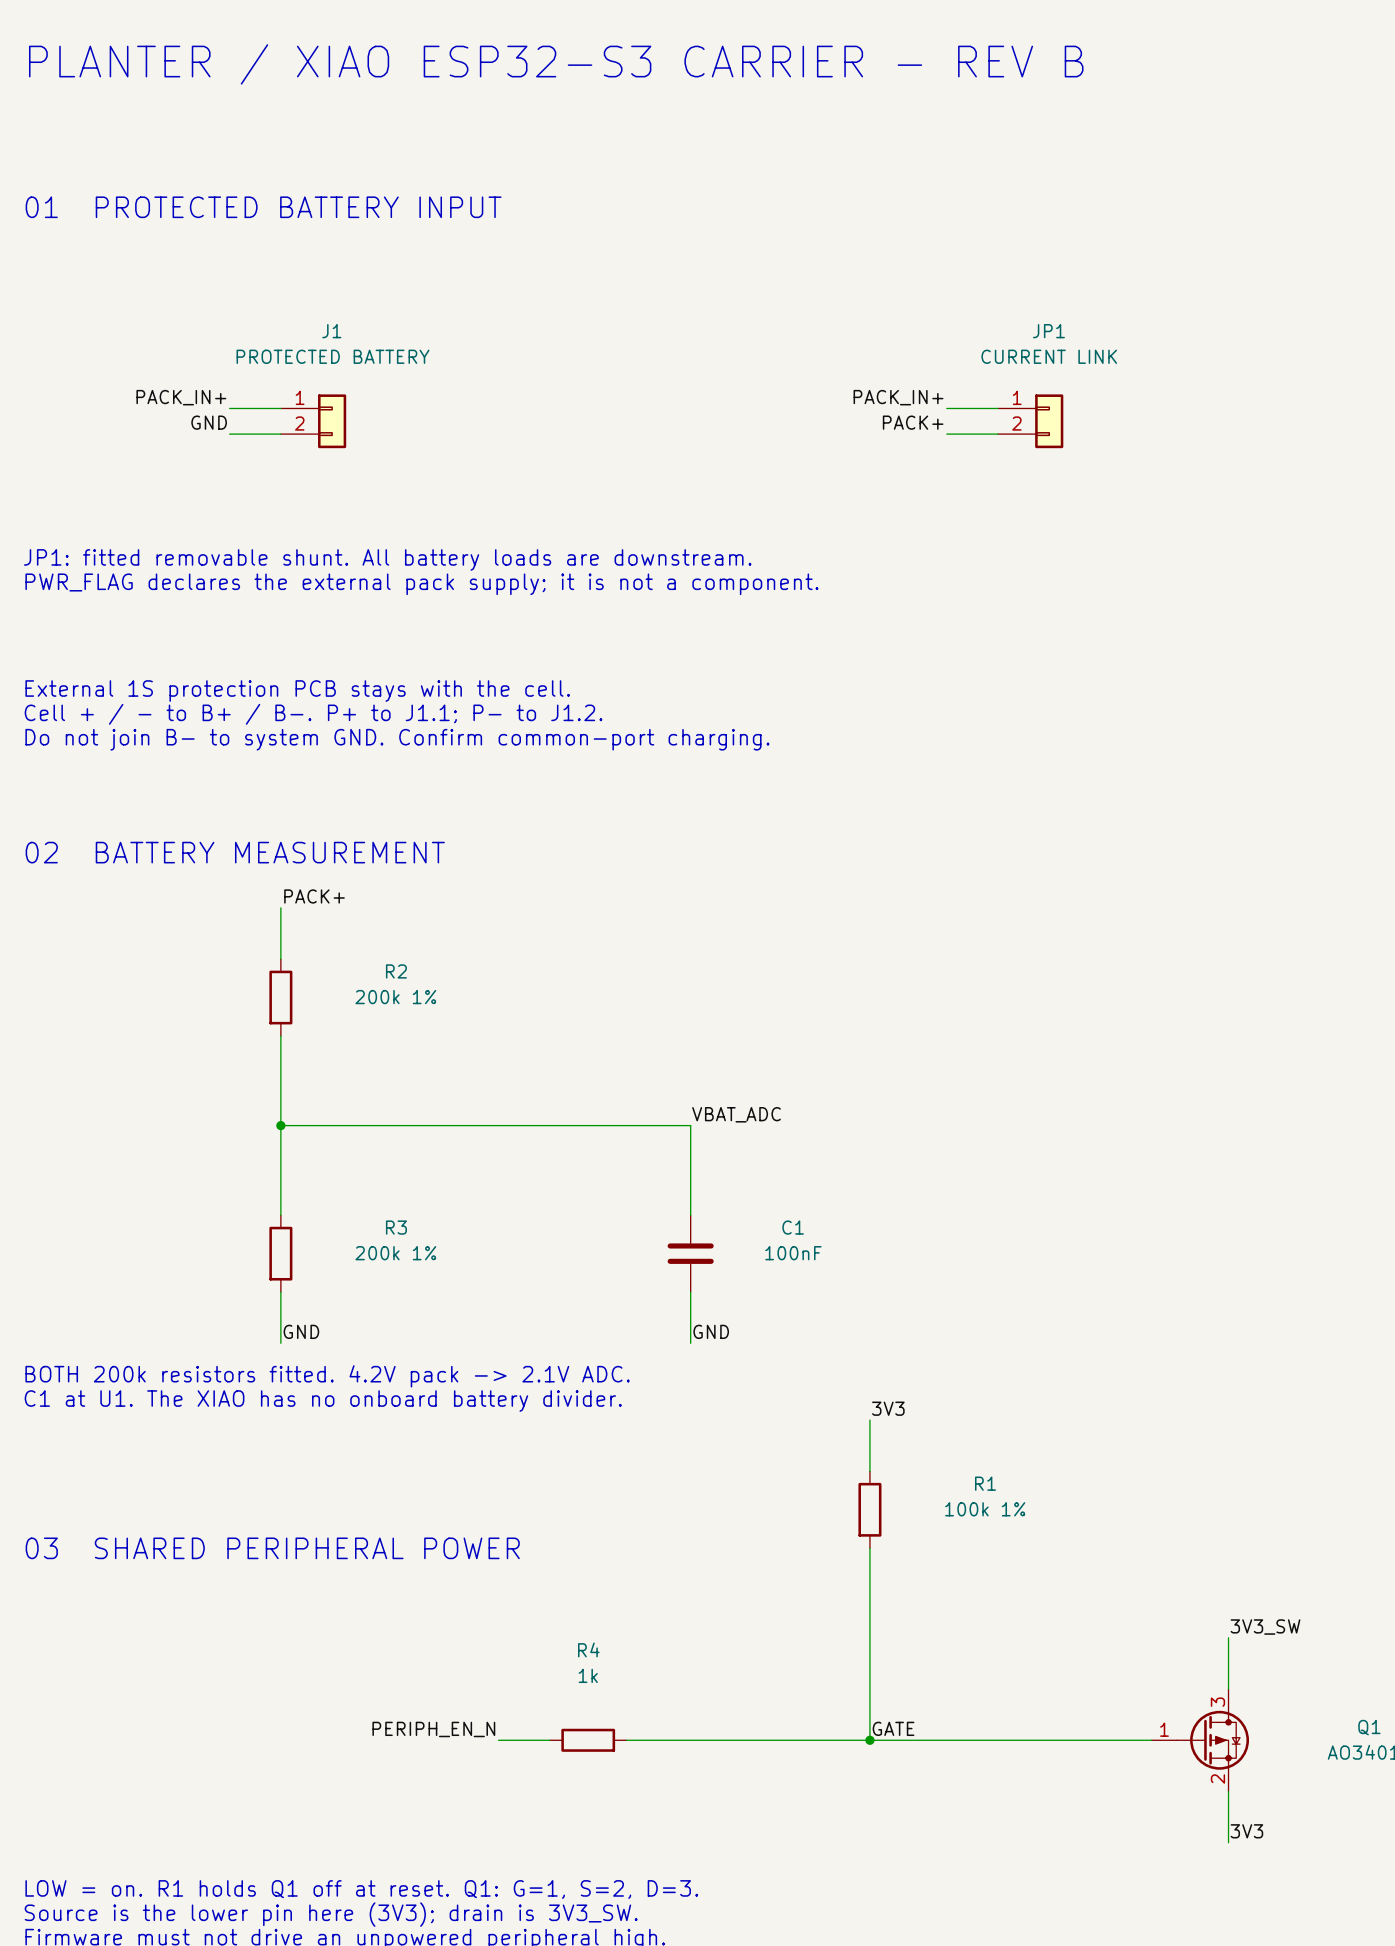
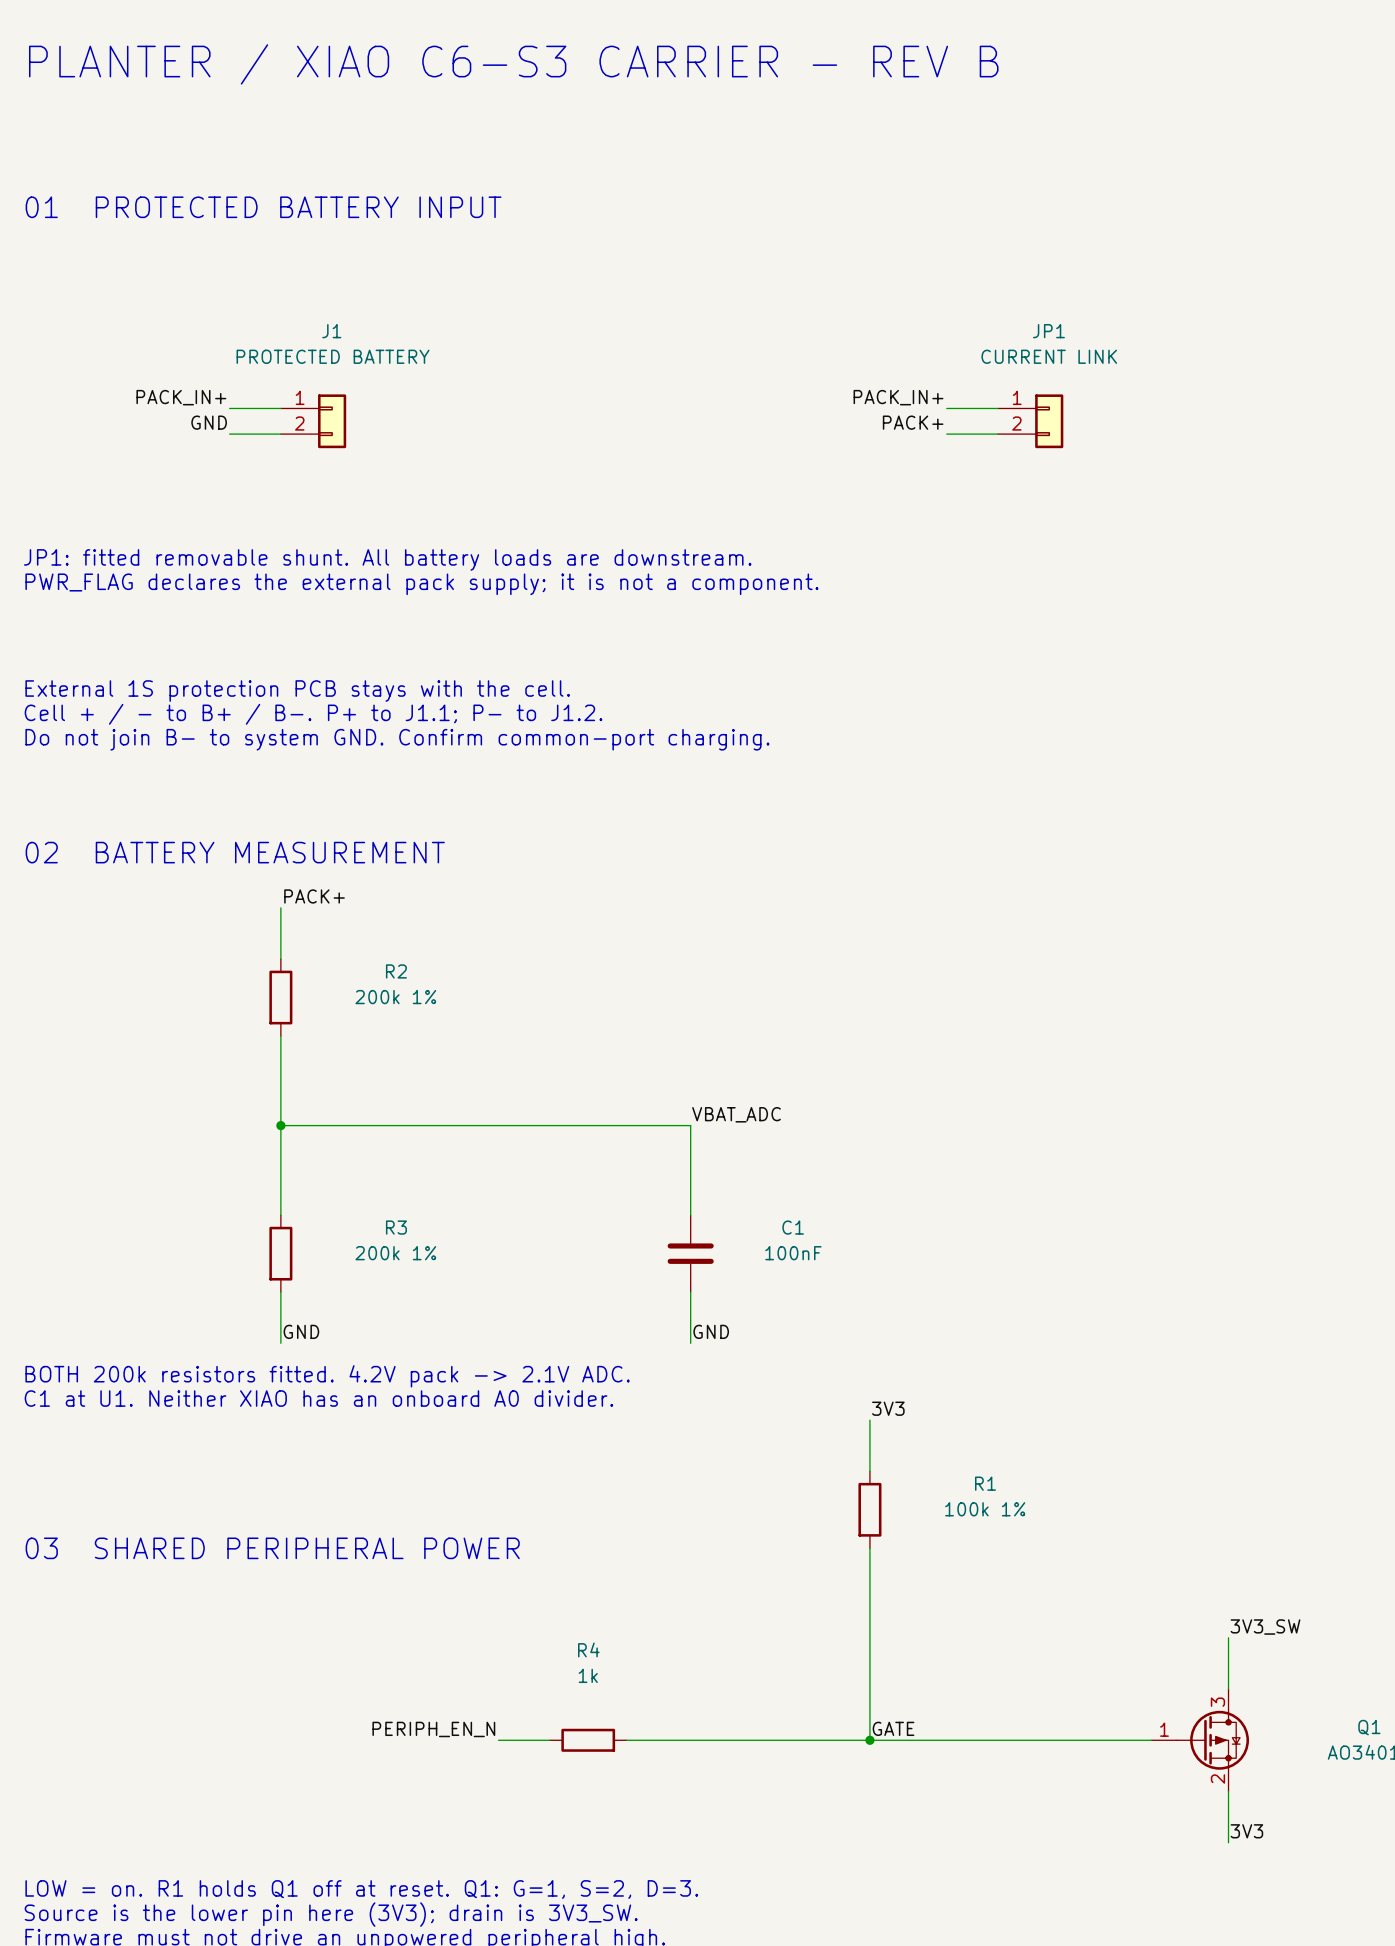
text: PLANTER / XIAO ESP32-S3 CARRIER - REV B (556, 64) -> PLANTER / XIAO C6-S3 CARRIER - REV B (513, 64)
text: C1 at U1. The XIAO has no onboard battery divider. (323, 1401) -> C1 at U1. Neither XIAO has an onboard A0 divider. (318, 1398)

